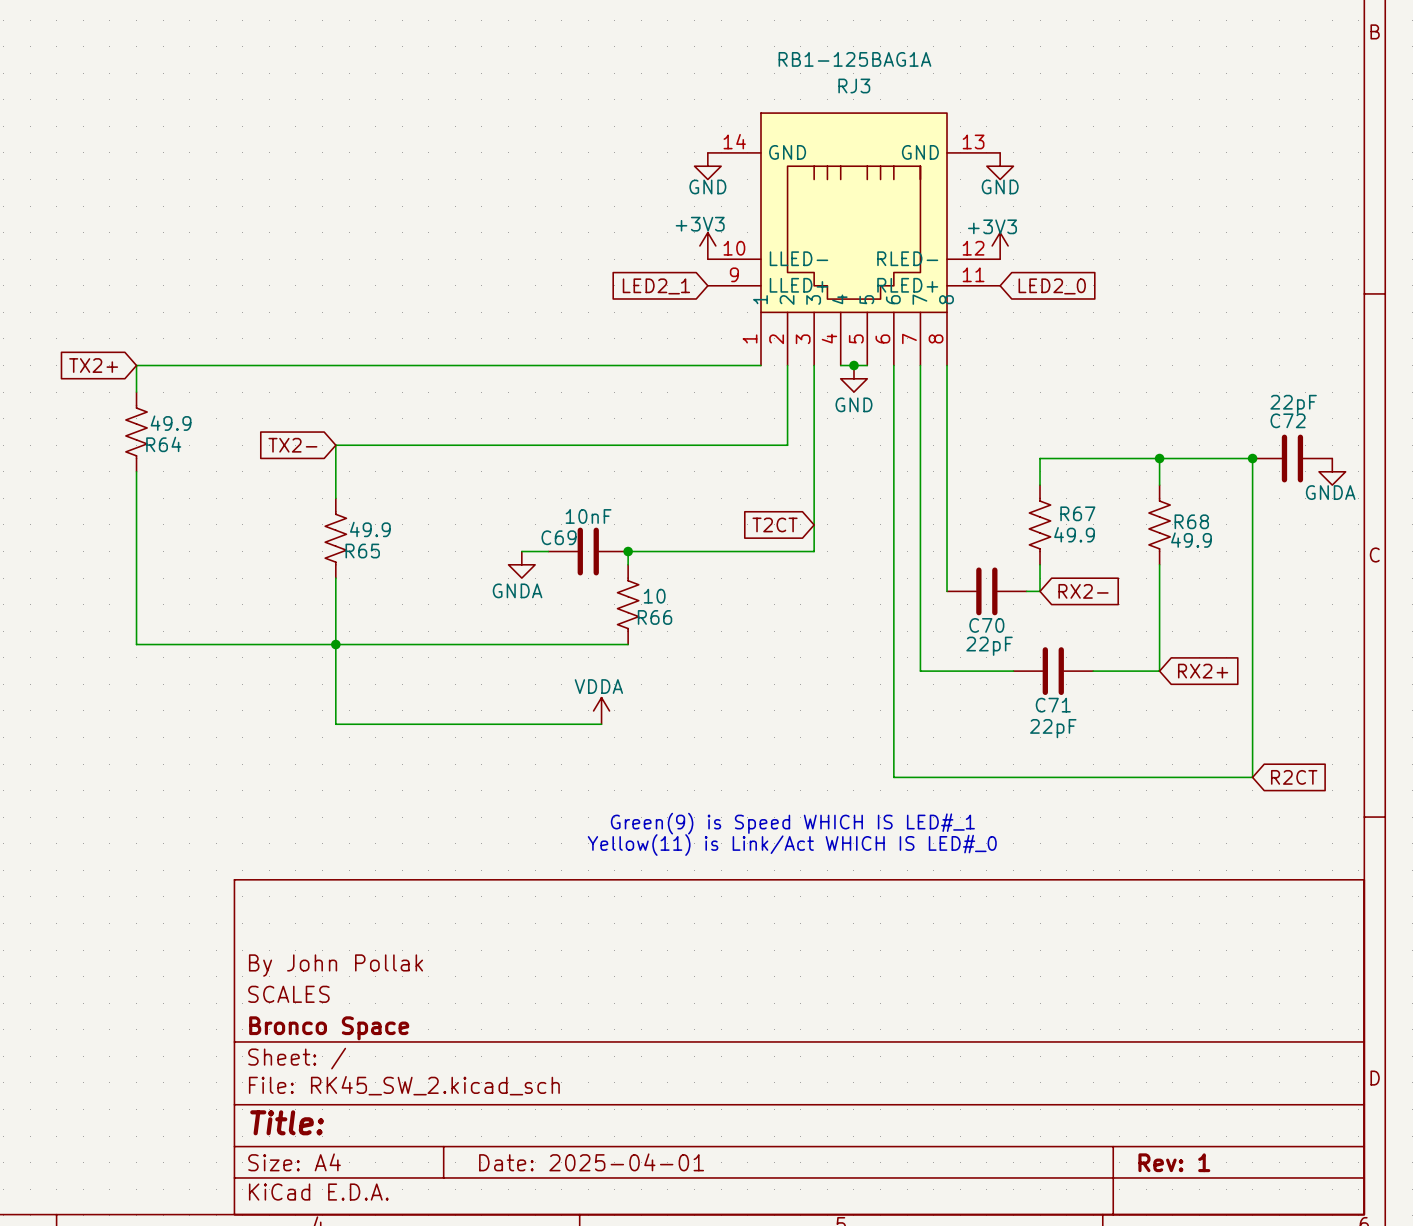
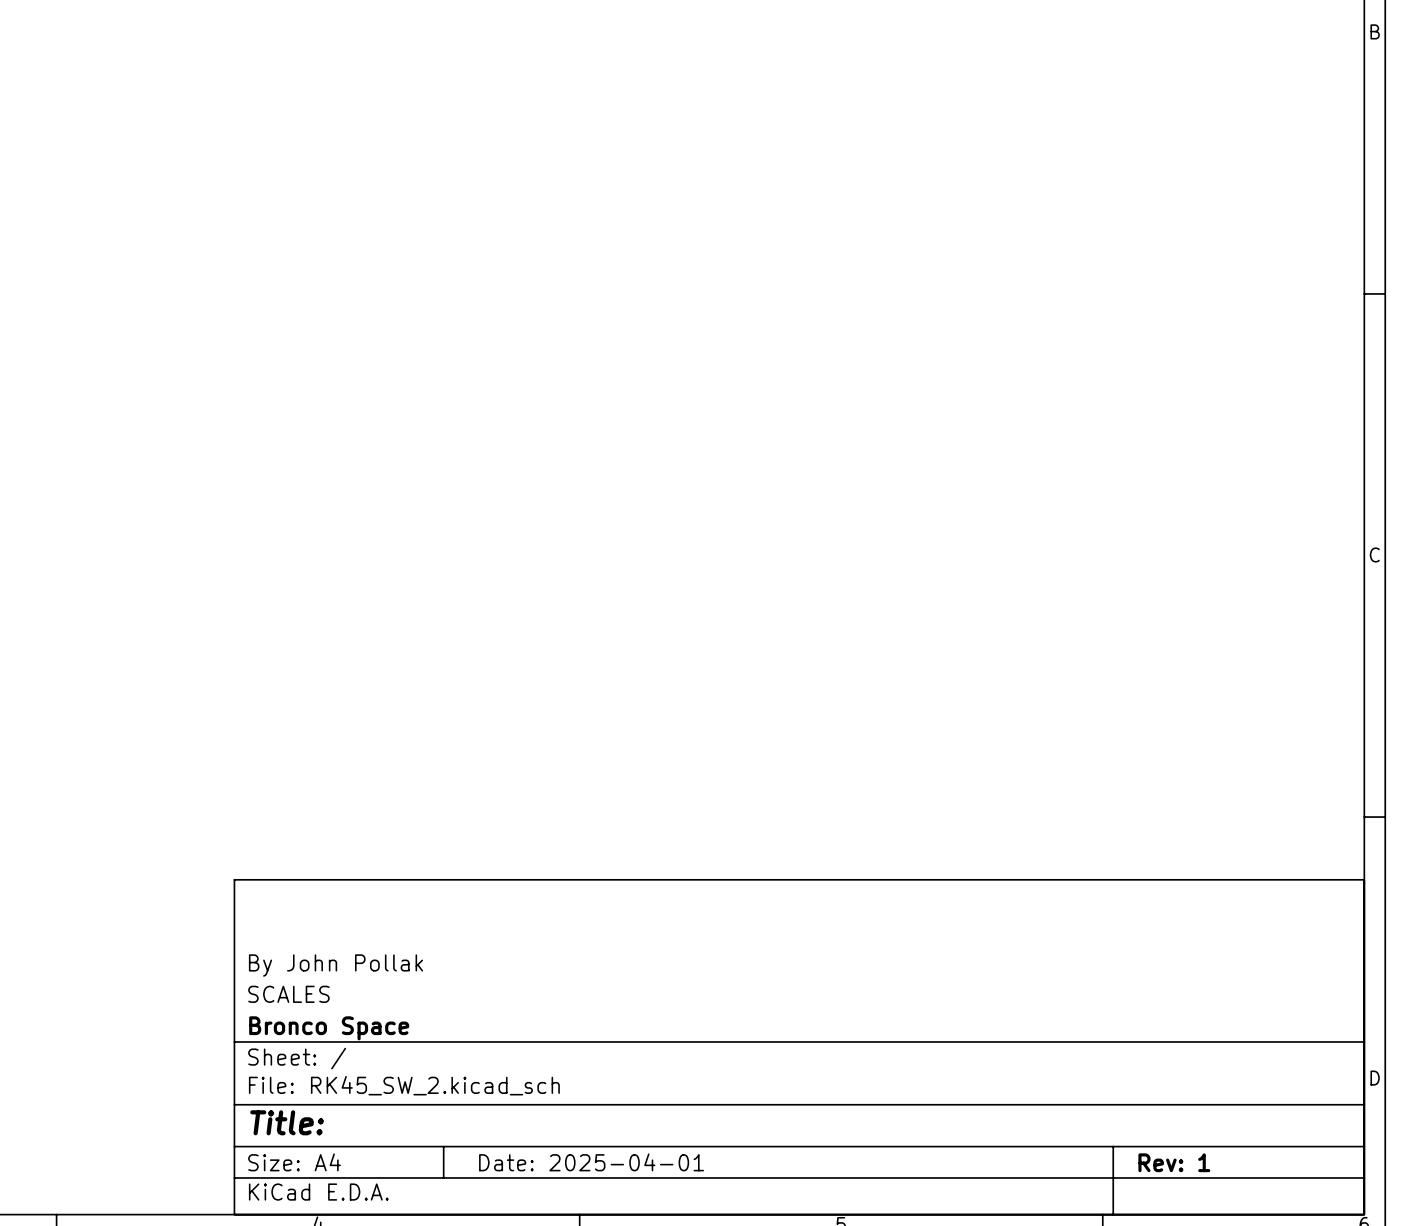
power symbol: GND (707, 166) -> none
power symbol: GND (1000, 166) -> none
RJ3: RB1-125BAG1A (853, 239) -> none
power symbol: +3V3 (707, 245) -> none
power symbol: +3V3 (1000, 245) -> none
global label: LED2_1 (656, 286) -> none
global label: LED2_0 (1052, 286) -> none
global label: TX2+ (93, 365) -> none
wire: (760, 365) (136, 365) (136, 392) -> none
wire: (787, 365) (787, 445) (335, 445) (335, 498) -> none
wire: (814, 365) (814, 551) (628, 551) (628, 564) -> none
wire: (840, 365) (867, 365) -> none
junction: (853, 365) -> none
wire: (893, 365) (893, 777) (1252, 777) (1252, 458) (1040, 458) (1040, 485) -> none
wire: (920, 365) (920, 671) (1013, 671) -> none
wire: (947, 365) (947, 591) -> none
power symbol: GND (853, 378) -> none
R64: 49.9 (136, 431) -> none
global label: TX2- (292, 445) -> none
wire: (1159, 458) (1159, 485) -> none
junction: (1159, 458) -> none
junction: (1252, 458) -> none
C72: 22pF (1292, 458) -> none
wire: (136, 471) (136, 644) (628, 644) -> none
power symbol: GNDA (1332, 471) -> none
global label: T2CT (775, 524) -> none
R67: 49.9 (1040, 524) -> none
R68: 49.9 (1159, 524) -> none
R65: 49.9 (335, 538) -> none
wire: (521, 551) (548, 551) -> none
C69: 10nF (588, 551) -> none
junction: (628, 551) -> none
power symbol: GNDA (521, 564) -> none
wire: (1040, 564) (1040, 591) (1026, 591) -> none
wire: (1159, 564) (1159, 671) (1093, 671) -> none
wire: (335, 578) (335, 724) (601, 724) -> none
C70: 22pF (986, 591) -> none
global label: RX2- (1083, 591) -> none
R66: 10 (628, 604) -> none
junction: (335, 644) -> none
C71: 22pF (1053, 671) -> none
global label: RX2+ (1203, 671) -> none
power symbol: VDDA (601, 710) -> none
global label: R2CT (1294, 777) -> none
text: Green(9) is Speed WHICH IS LED#_1 (792, 823) -> none
text: Yellow(11) is Link/Act WHICH IS LED#_0 (792, 845) -> none

